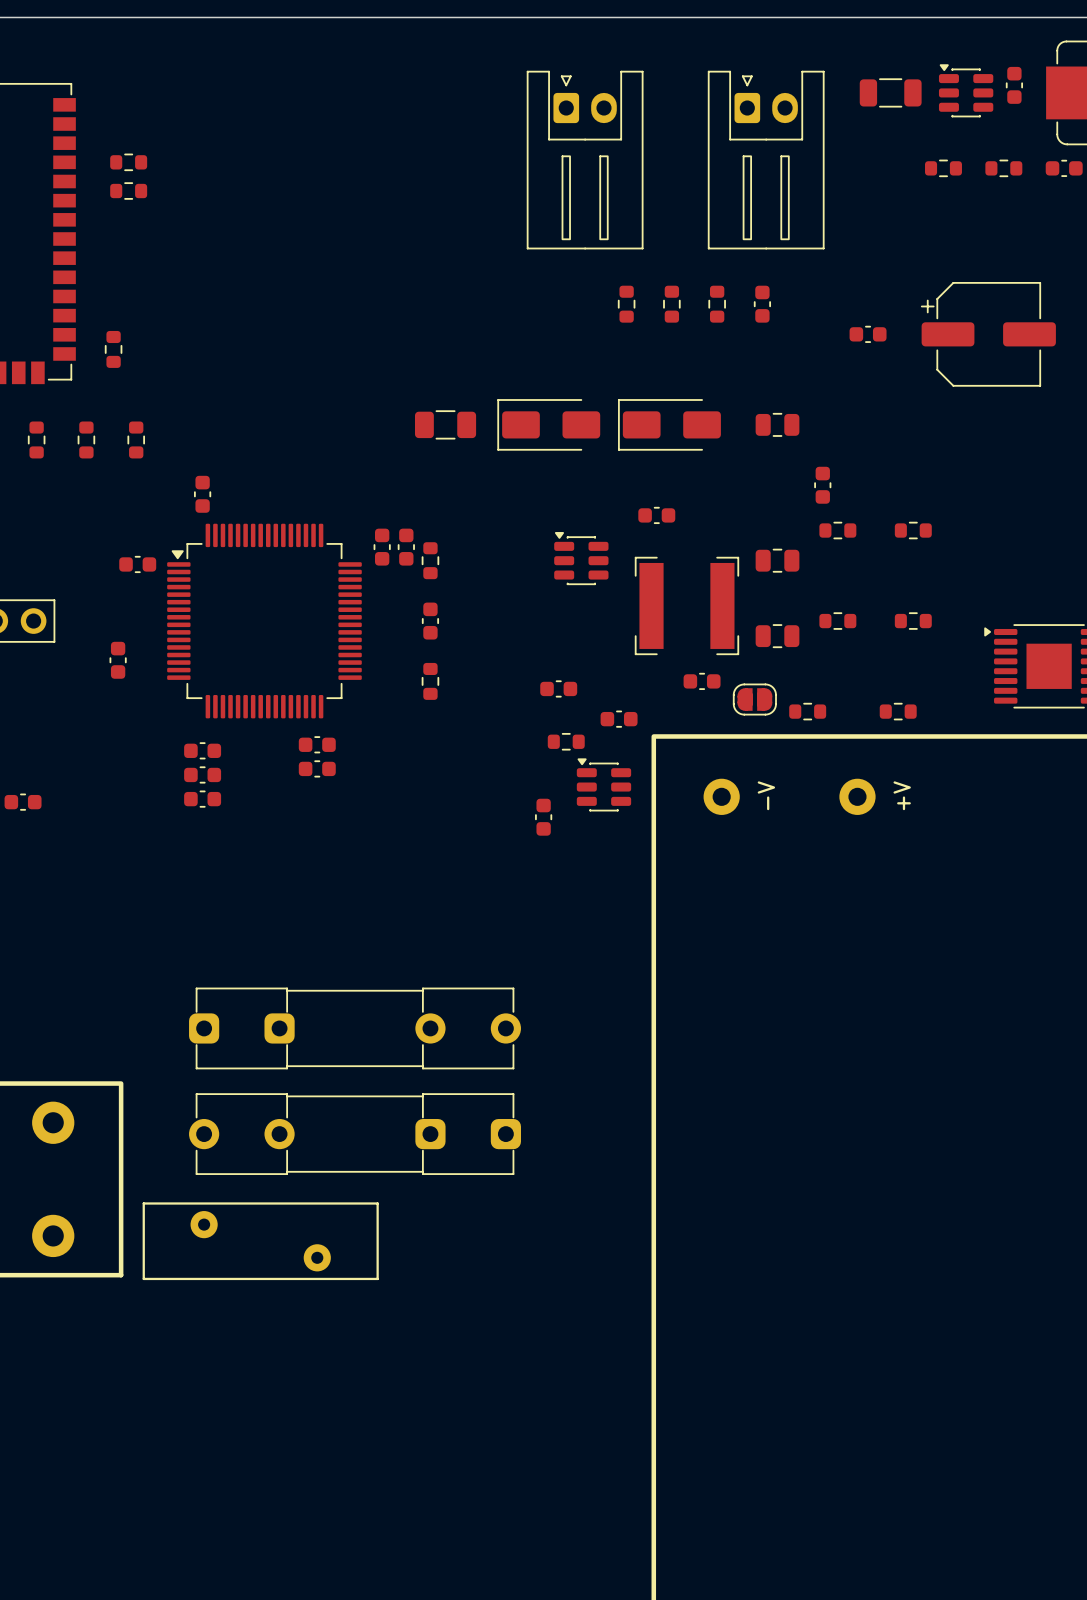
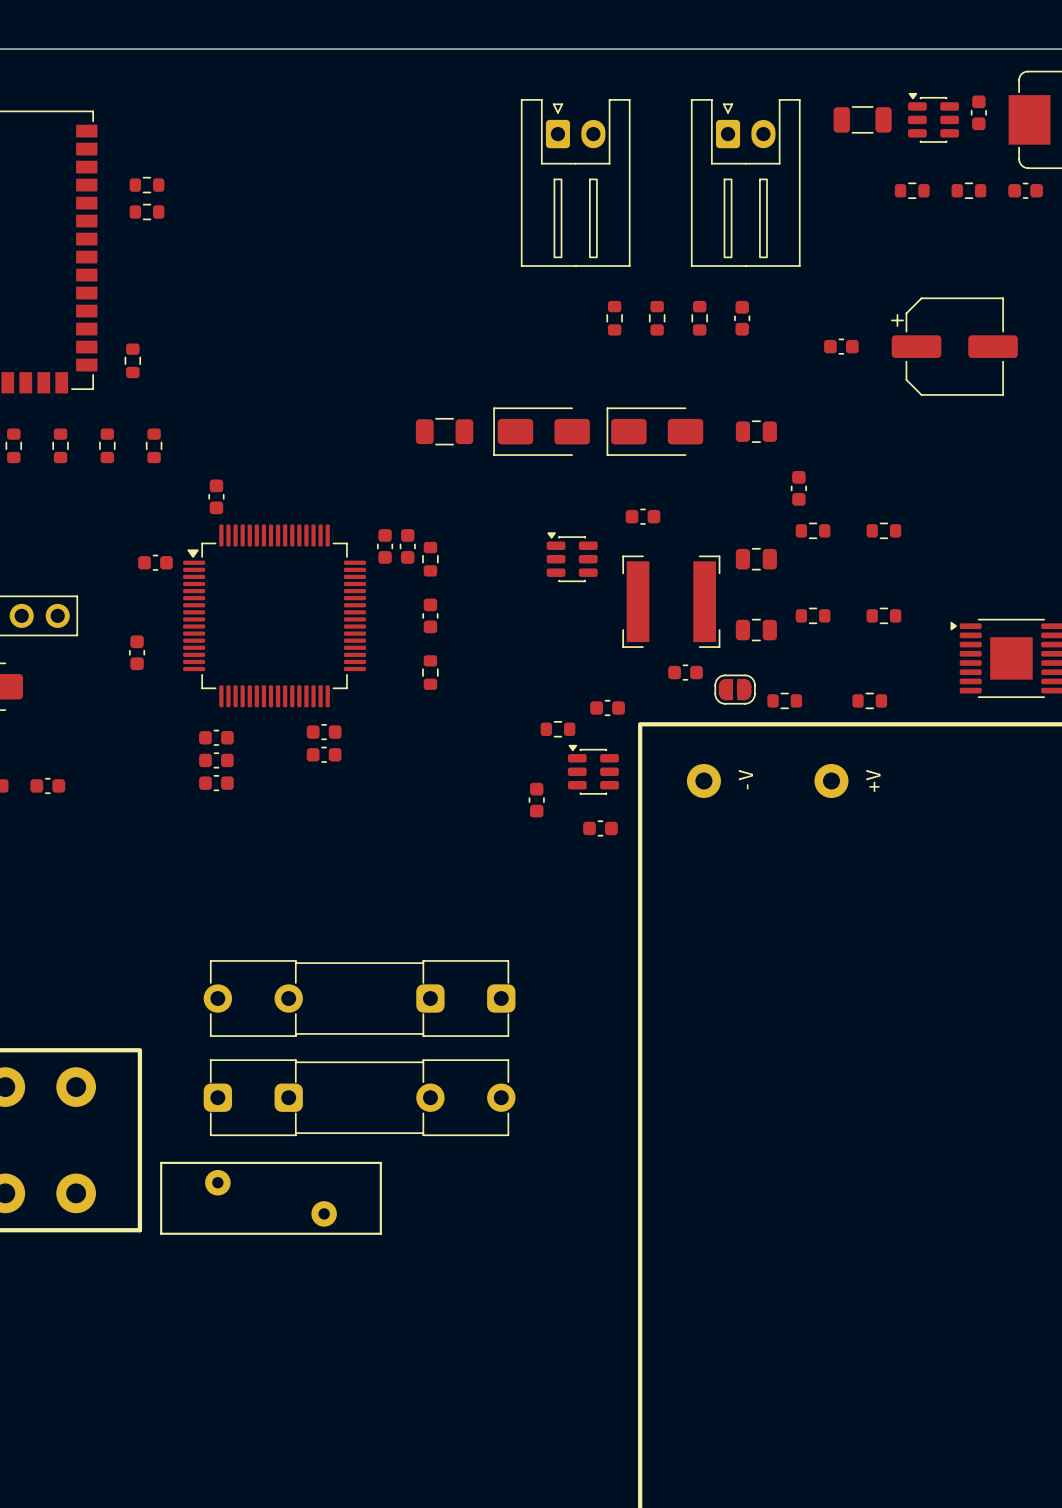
part position: (558, 688) -> (600, 828)
part rotation: 0° (355, 1028) -> 180° (359, 998)
part rotation: 0° (355, 1134) -> 180° (359, 1097)

